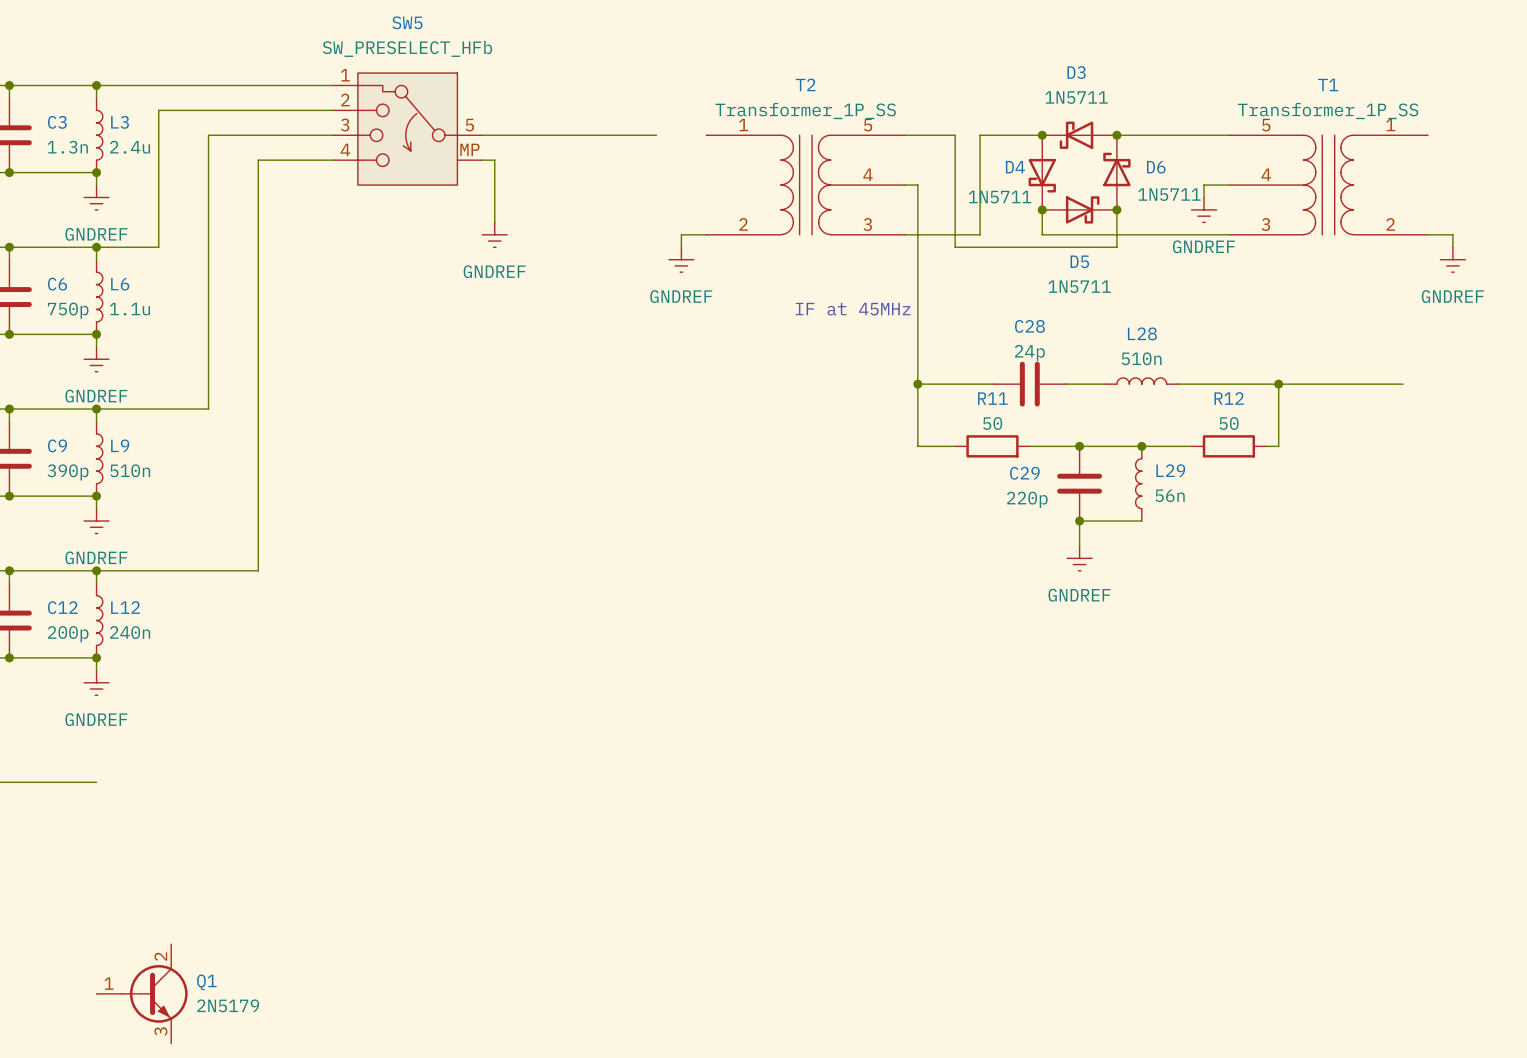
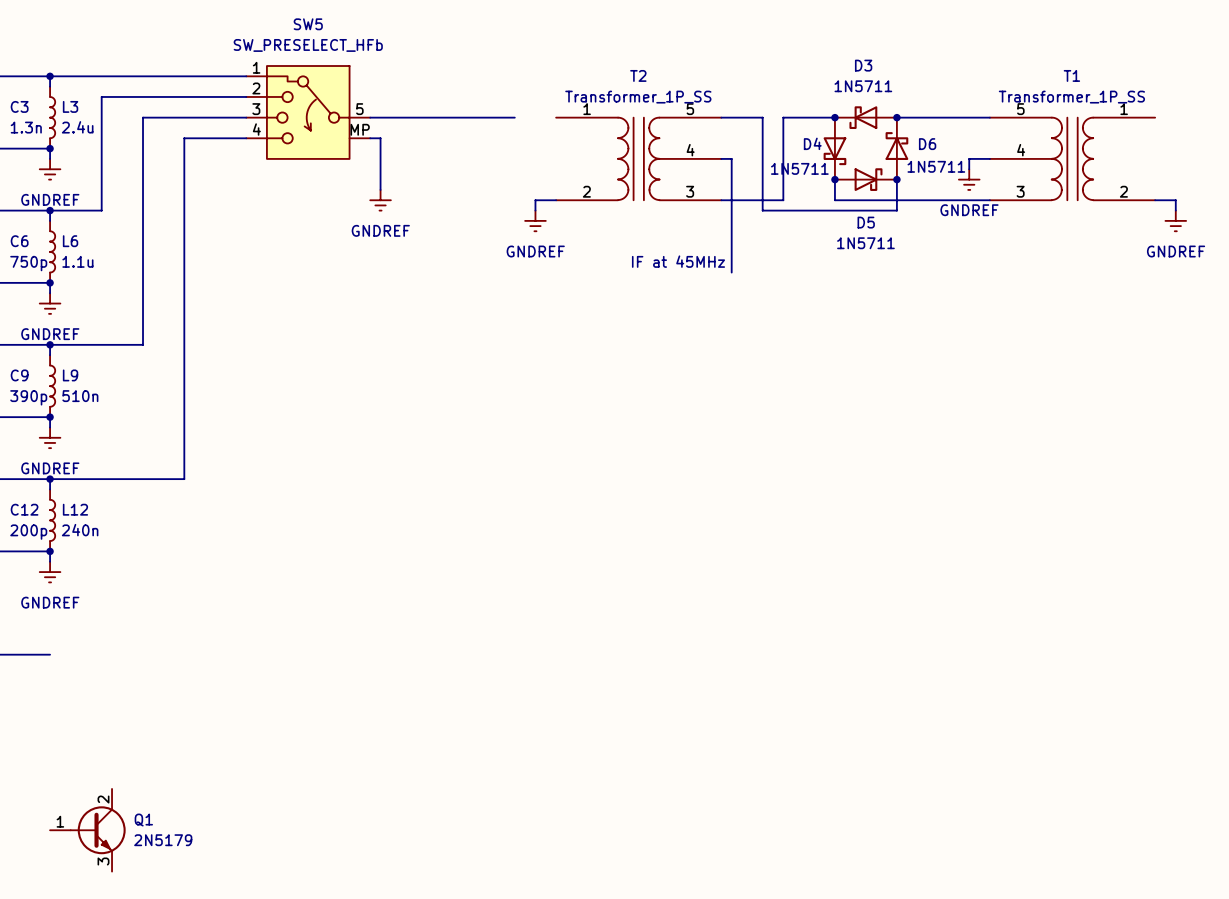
wire: (917, 321) (917, 446) (955, 446) -> none
L28: 510n (1141, 381) -> none
wire: (917, 384) (992, 384) -> none
junction: (917, 384) -> none
C28: 24p (1029, 384) -> none
wire: (1067, 384) (1104, 384) -> none
wire: (1179, 384) (1403, 384) -> none
wire: (1278, 384) (1278, 446) (1266, 446) -> none
junction: (1278, 384) -> none
R11: 50 (992, 446) -> none
wire: (1029, 446) (1191, 446) -> none
junction: (1079, 446) -> none
junction: (1141, 446) -> none
R12: 50 (1228, 446) -> none
C29: 220p (1079, 483) -> none
L29: 56n (1138, 483) -> none
junction: (1079, 521) -> none
wire: (1141, 521) (1079, 521) (1079, 545) -> none
power symbol: GNDREF (1079, 558) -> none

